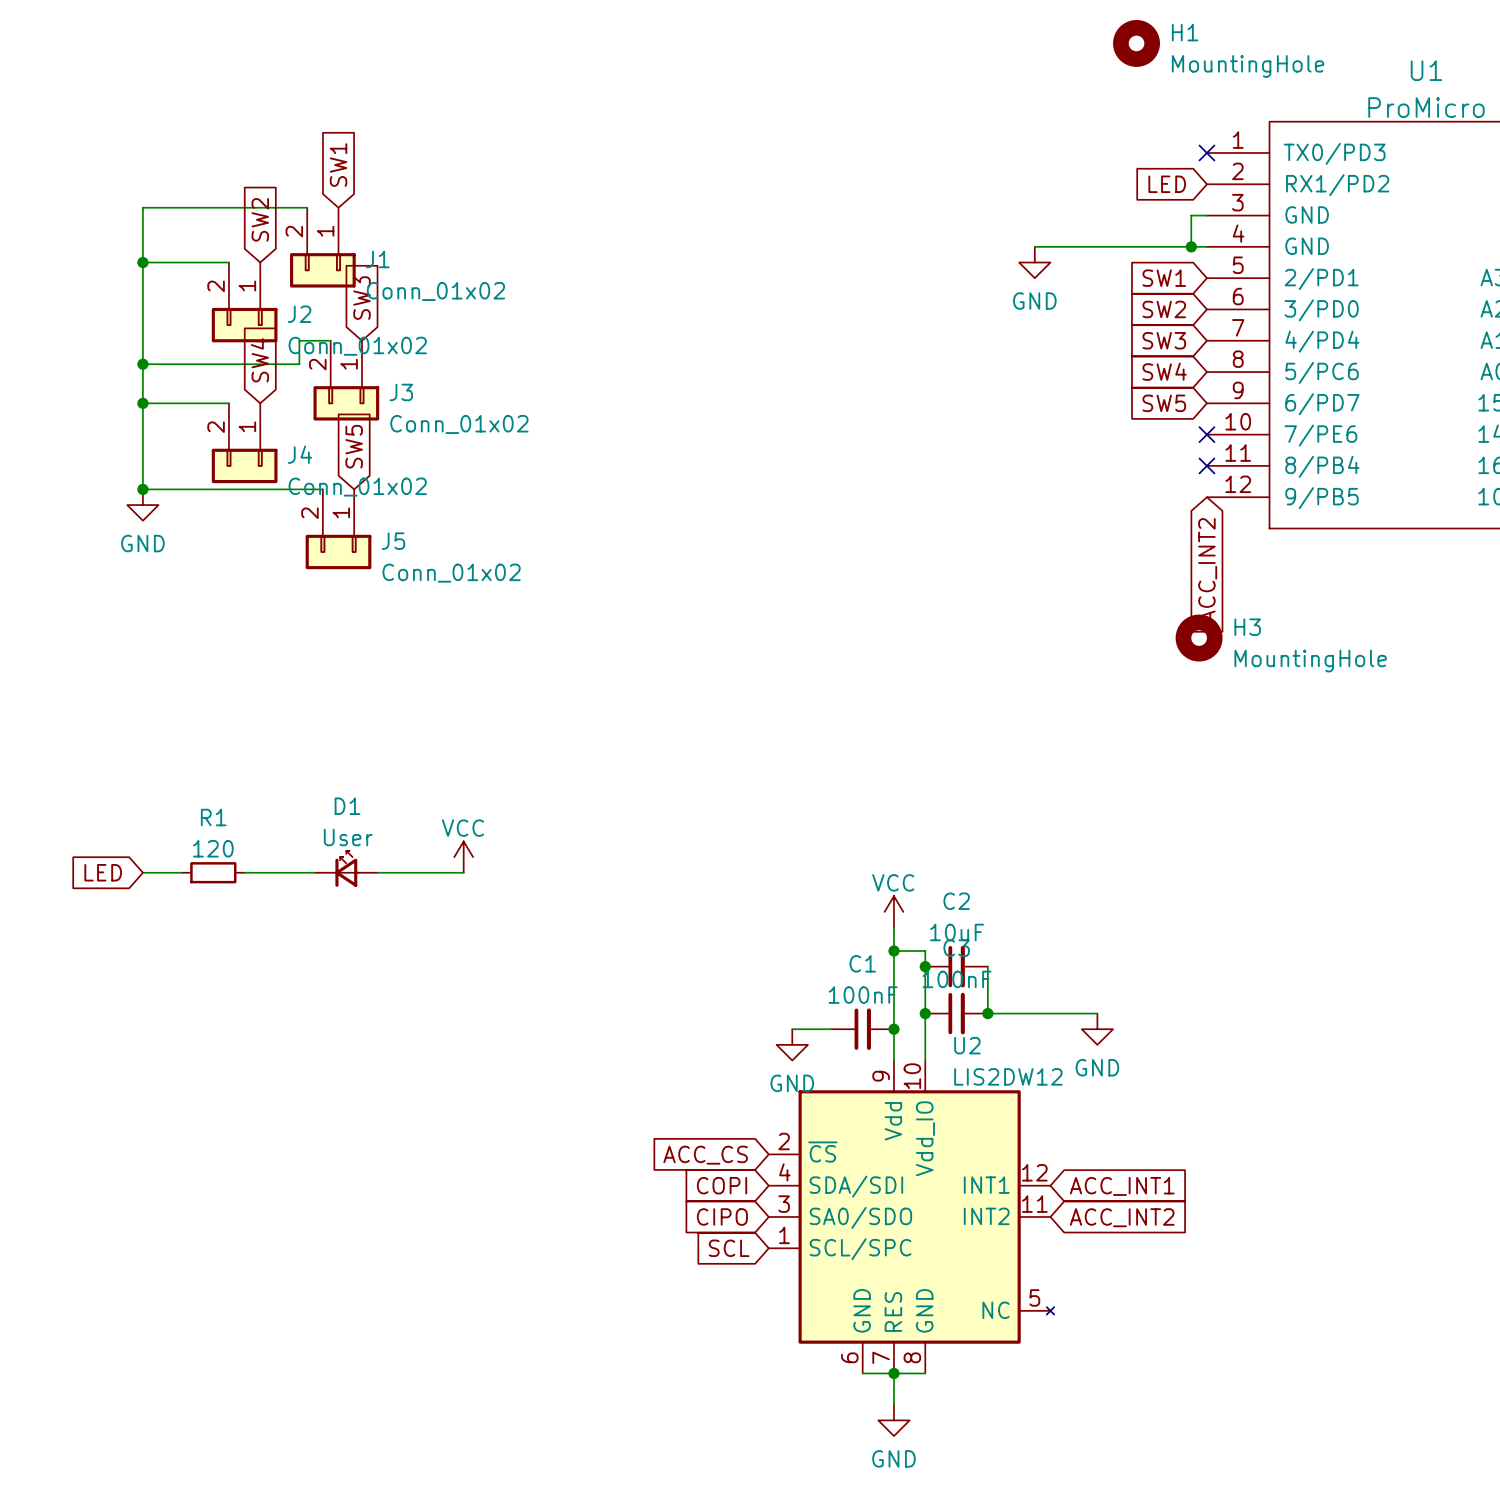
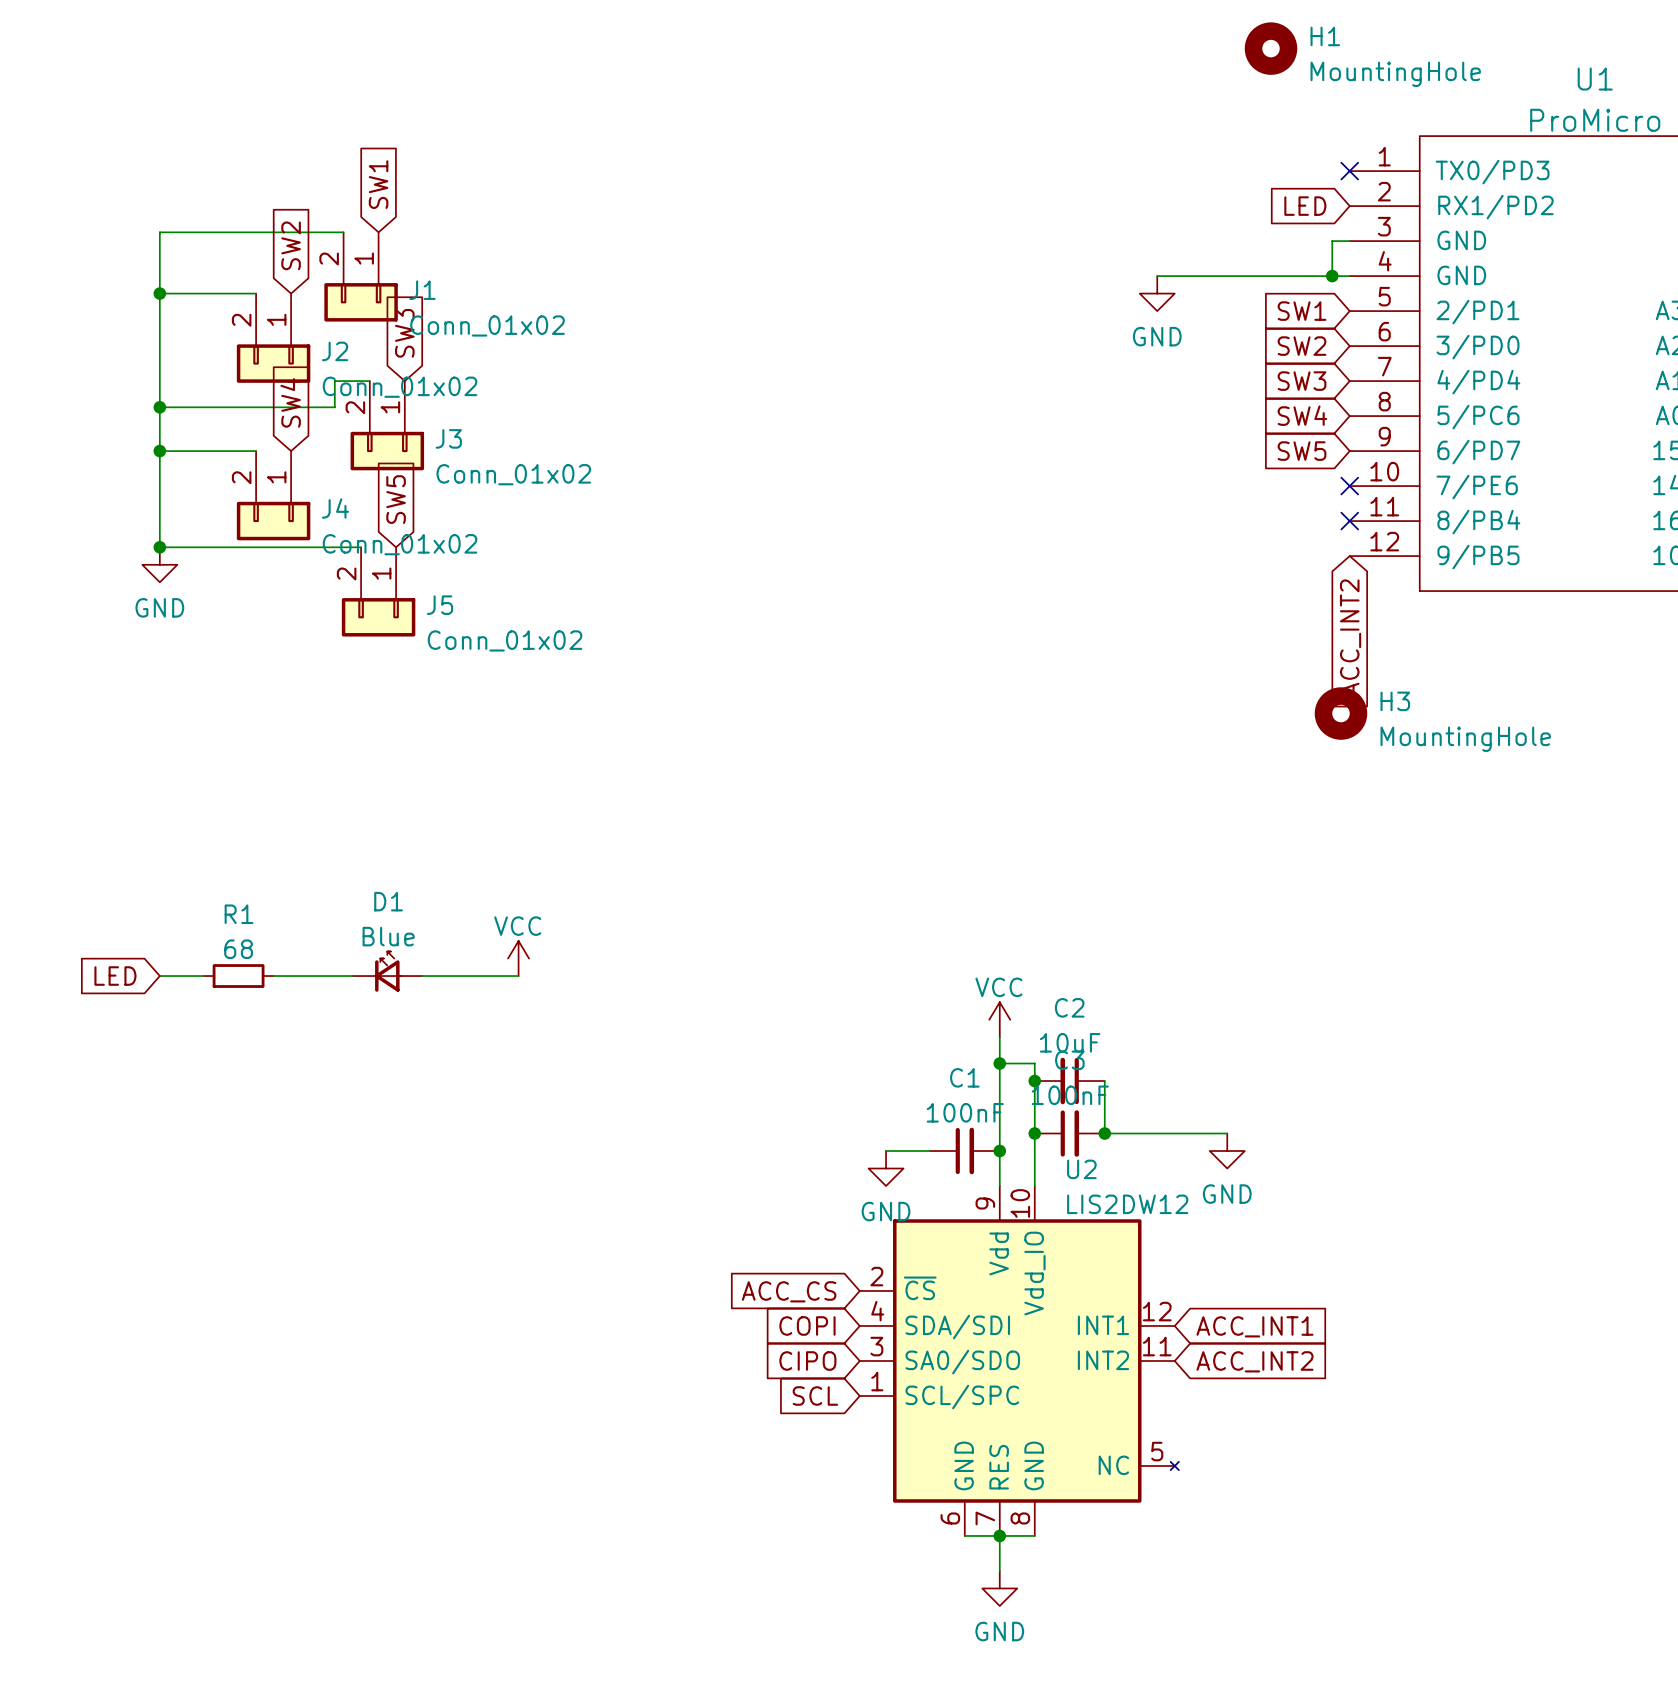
D1 value: User (348, 837) -> Blue (388, 936)
R1 value: 120 (213, 848) -> 68 (238, 949)
C2 rotation: 0° (956, 966) -> 180° (1069, 1081)

